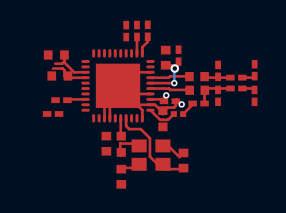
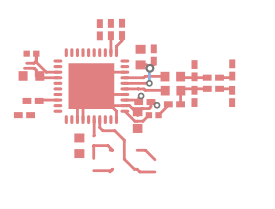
part footprint: [43, 50, 69, 60] -> [23, 50, 40, 57]
part: (121, 144) -> none
part: (151, 155) -> none
part: (183, 160) -> none
part: (121, 176) -> none

